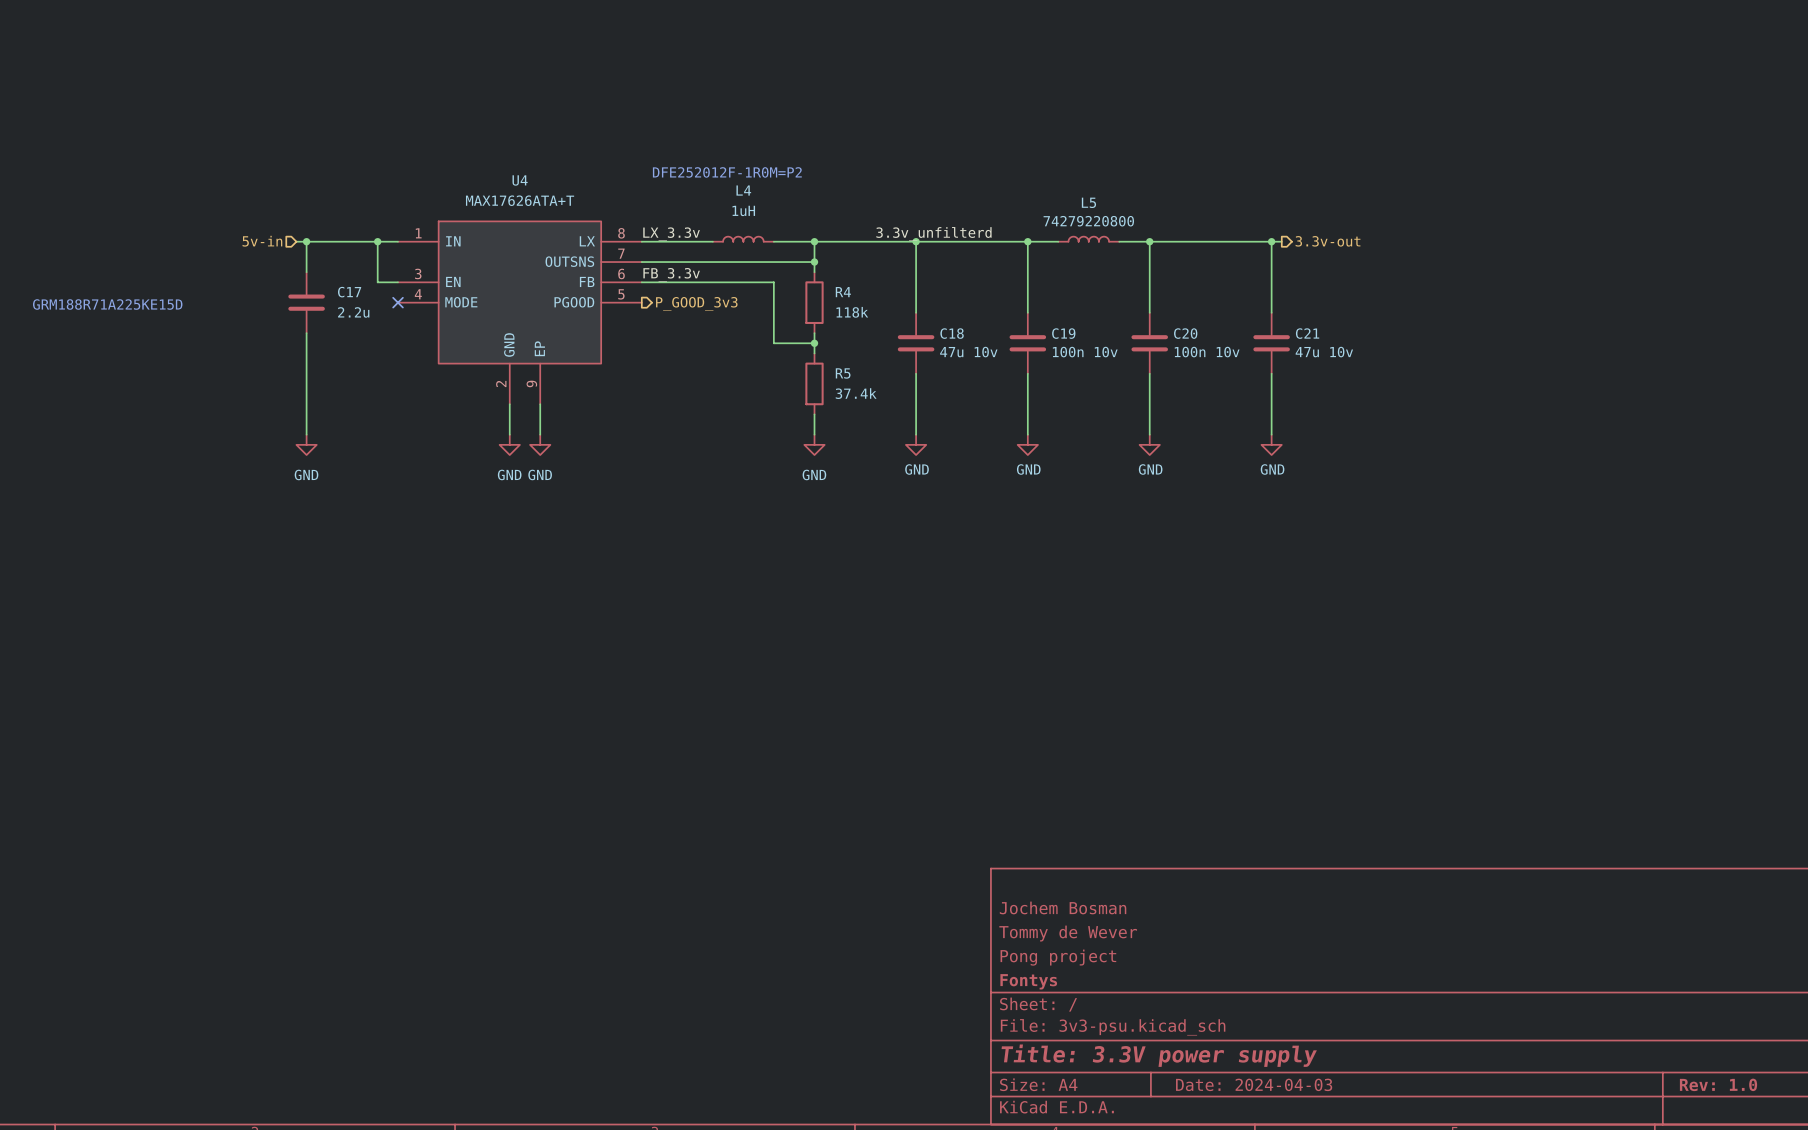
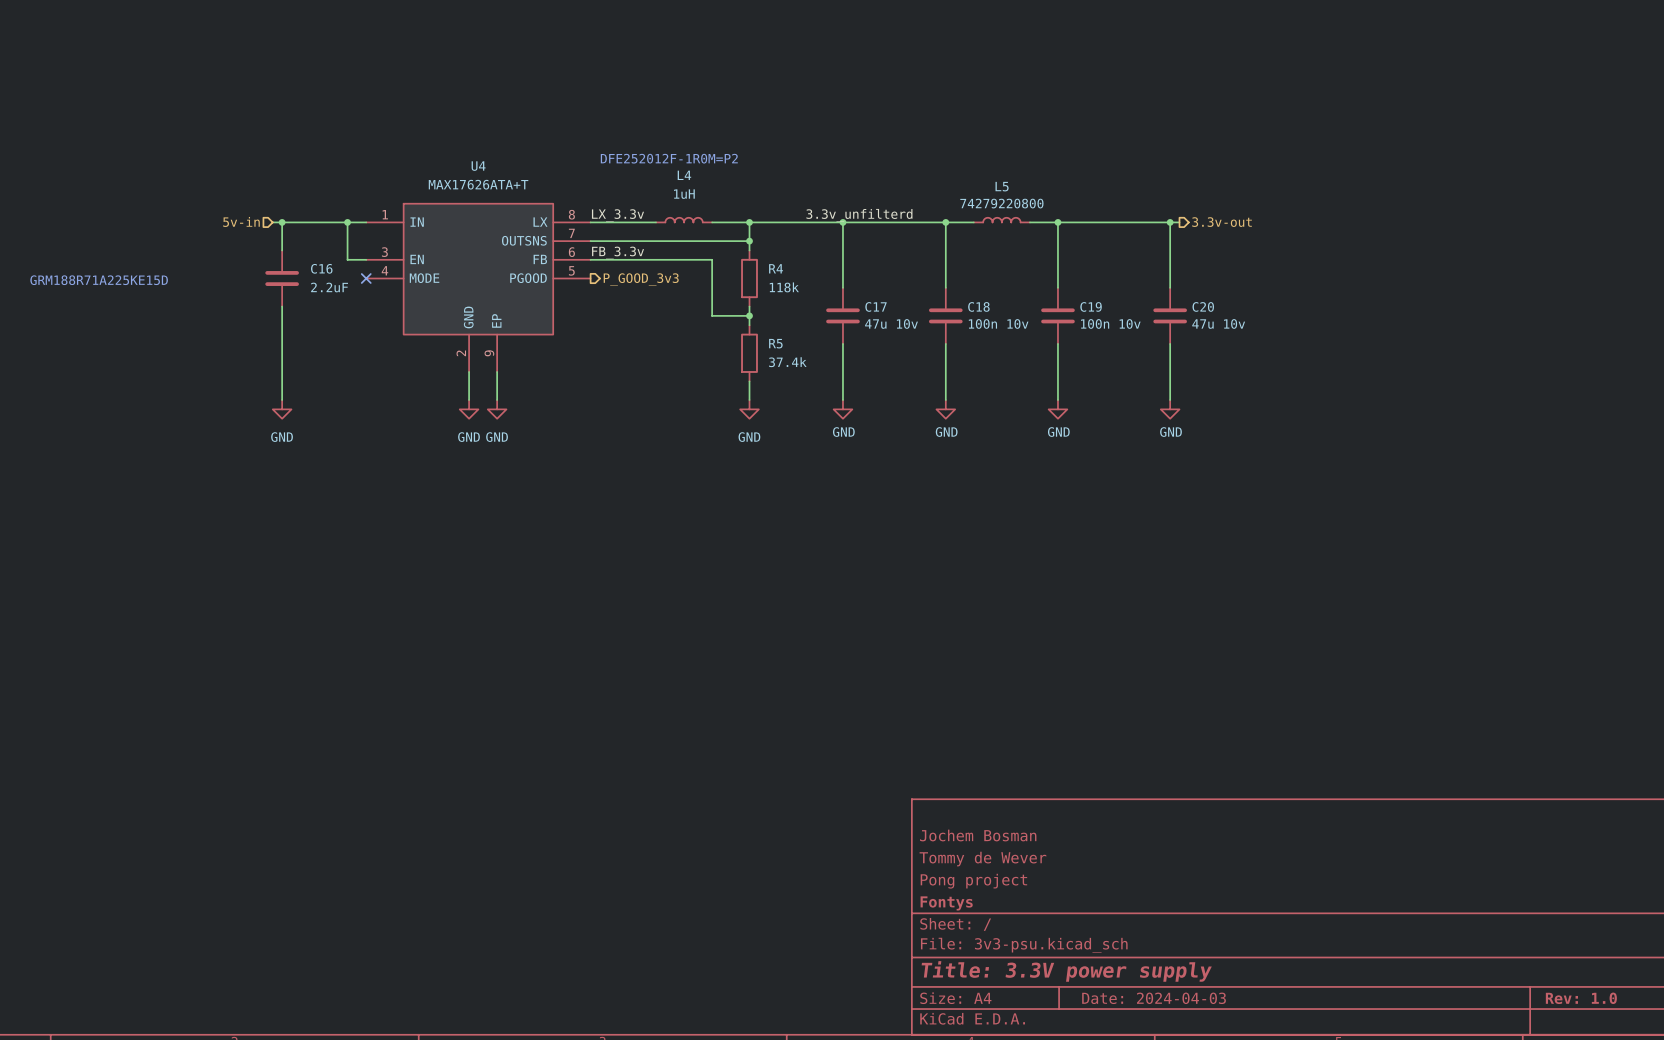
C17 name: C17 (349, 292) -> C16 (321, 268)
C17 value: 2.2u (353, 312) -> 2.2uF (329, 287)
C18 name: C18 (952, 333) -> C17 (876, 306)
C19 name: C19 (1063, 333) -> C18 (978, 306)
C20 name: C20 (1185, 333) -> C19 (1091, 306)
C21 name: C21 (1307, 333) -> C20 (1203, 306)

